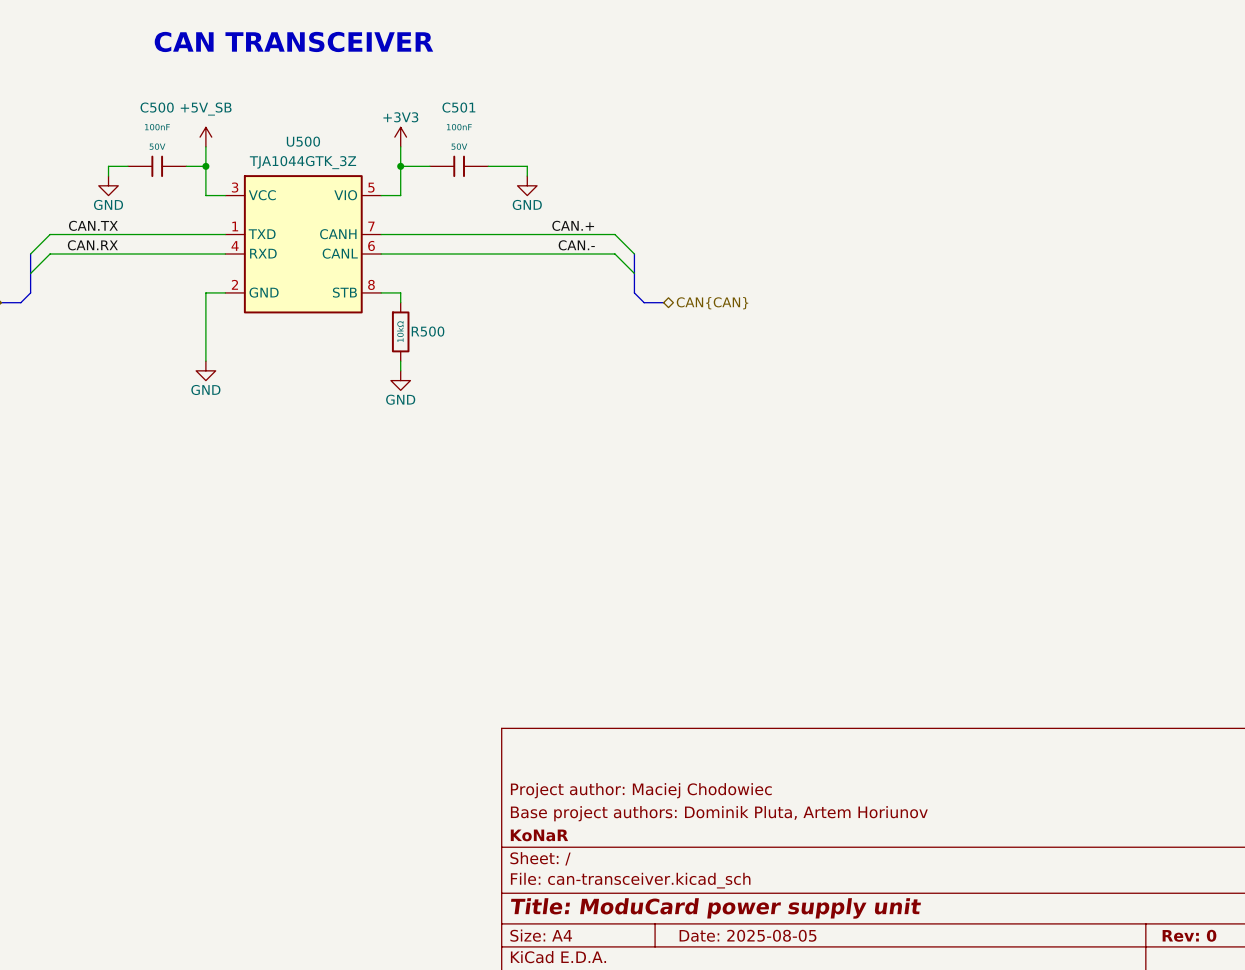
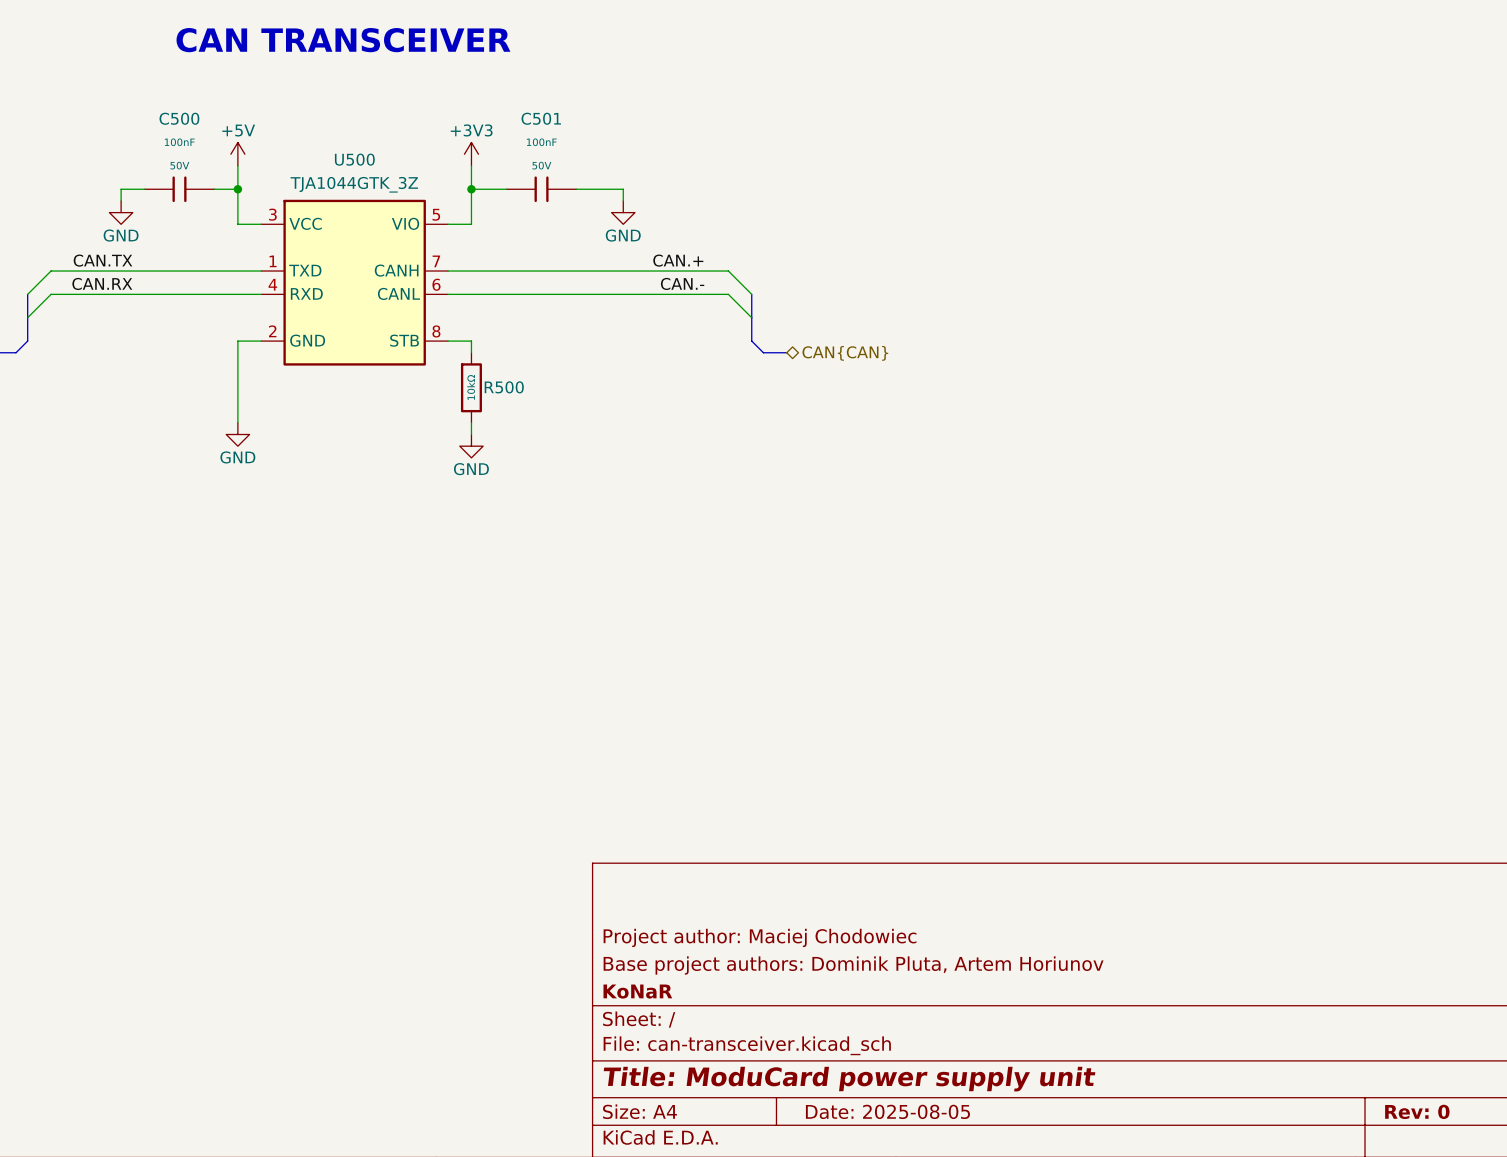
power symbol: +5V_SB (205, 137) -> +5V (237, 154)

